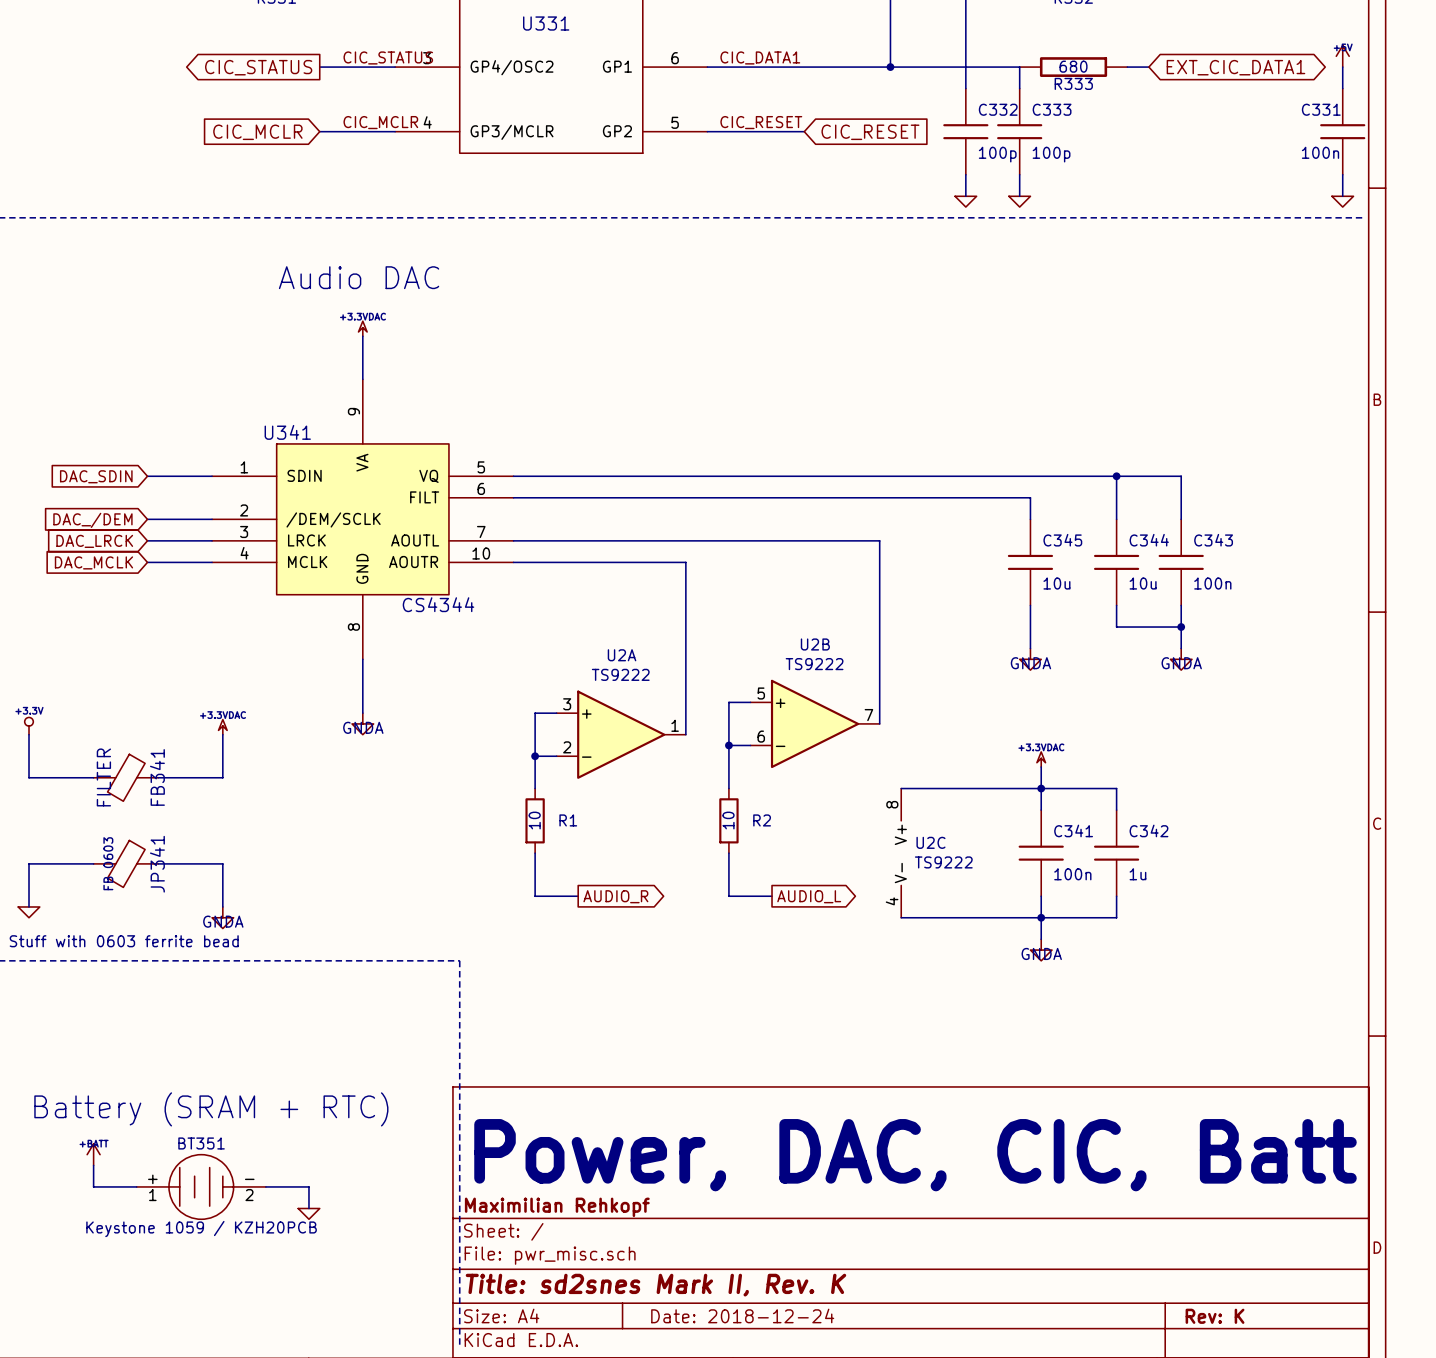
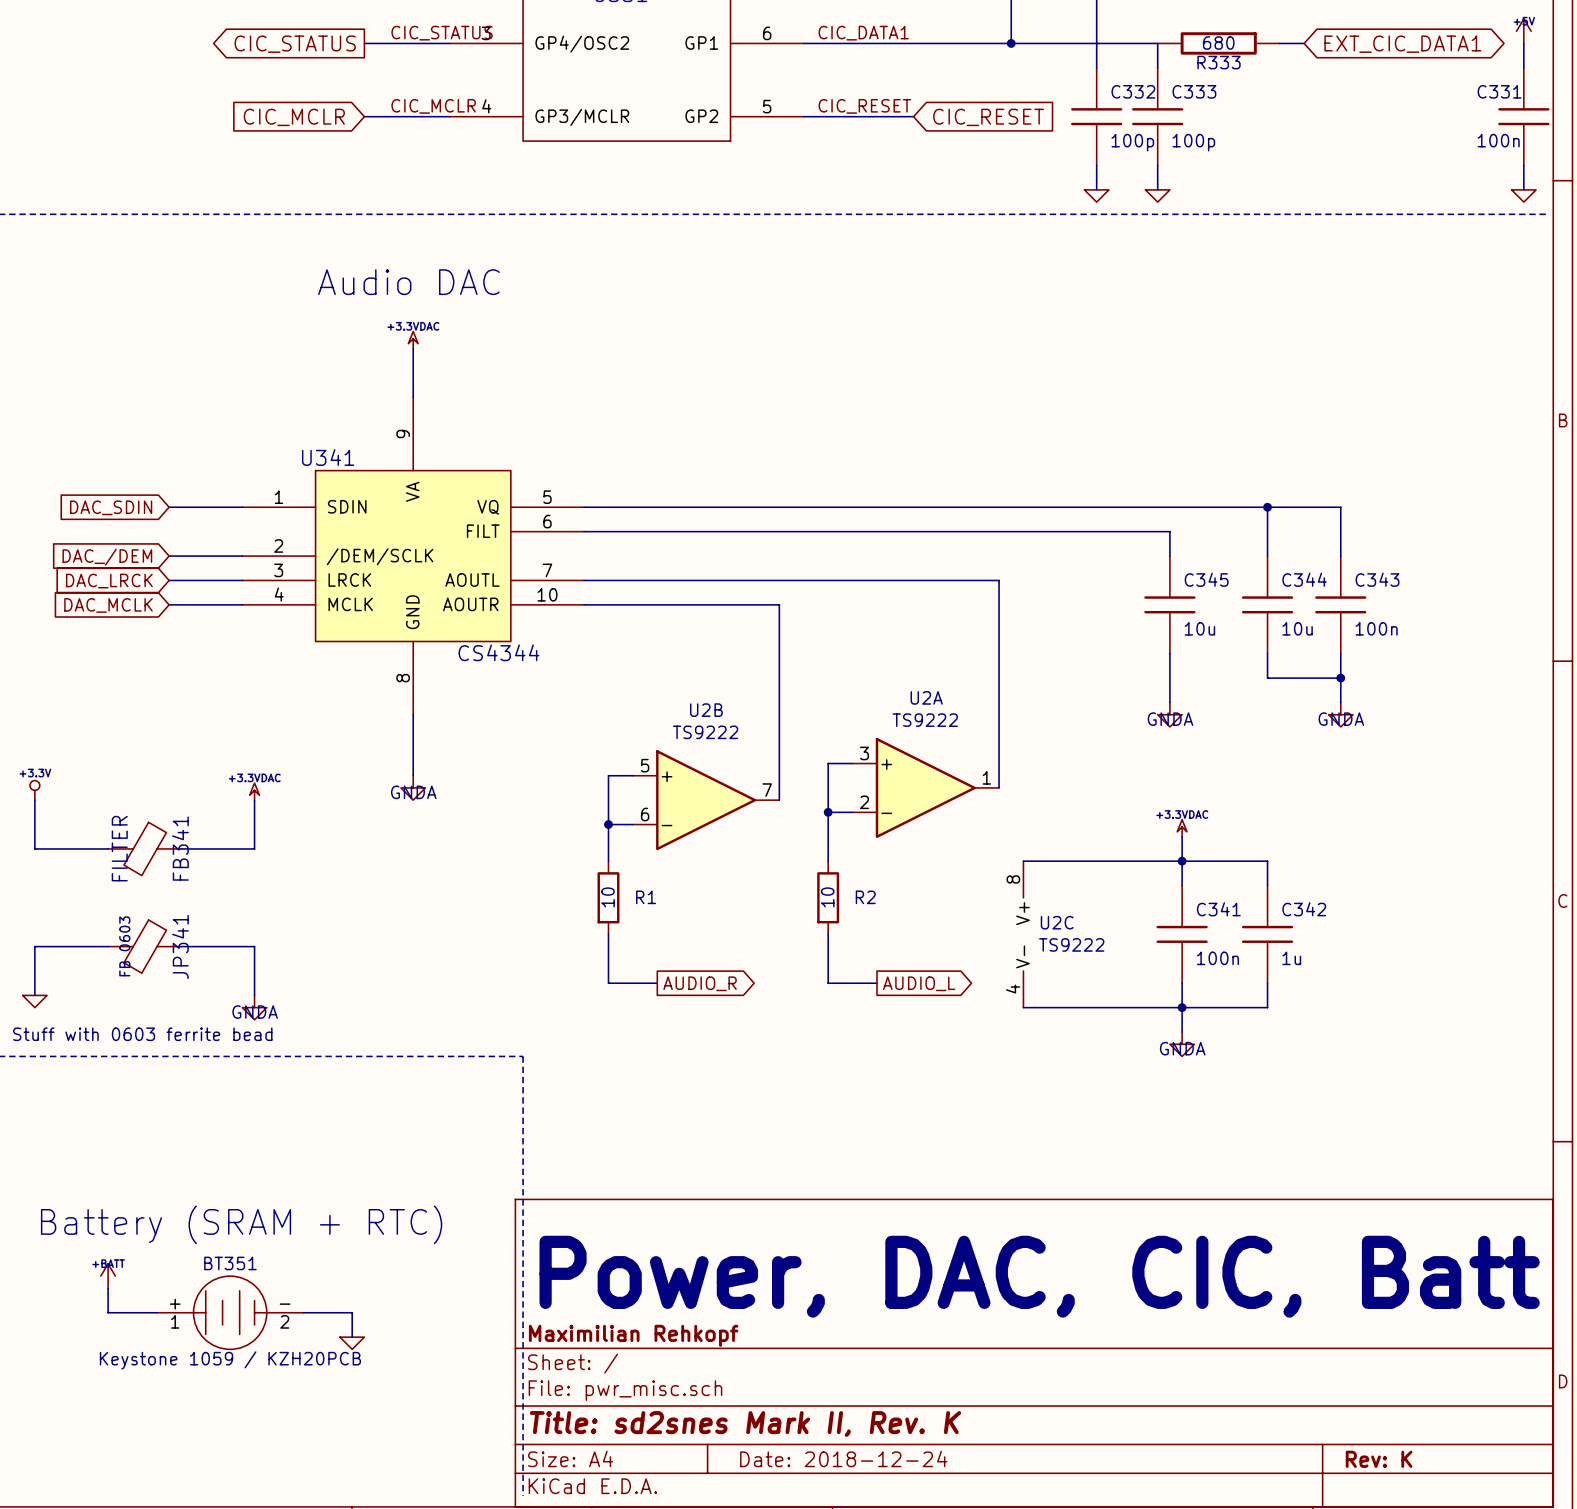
U2B position: (815, 723) -> (706, 800)
U2A position: (621, 734) -> (925, 787)

